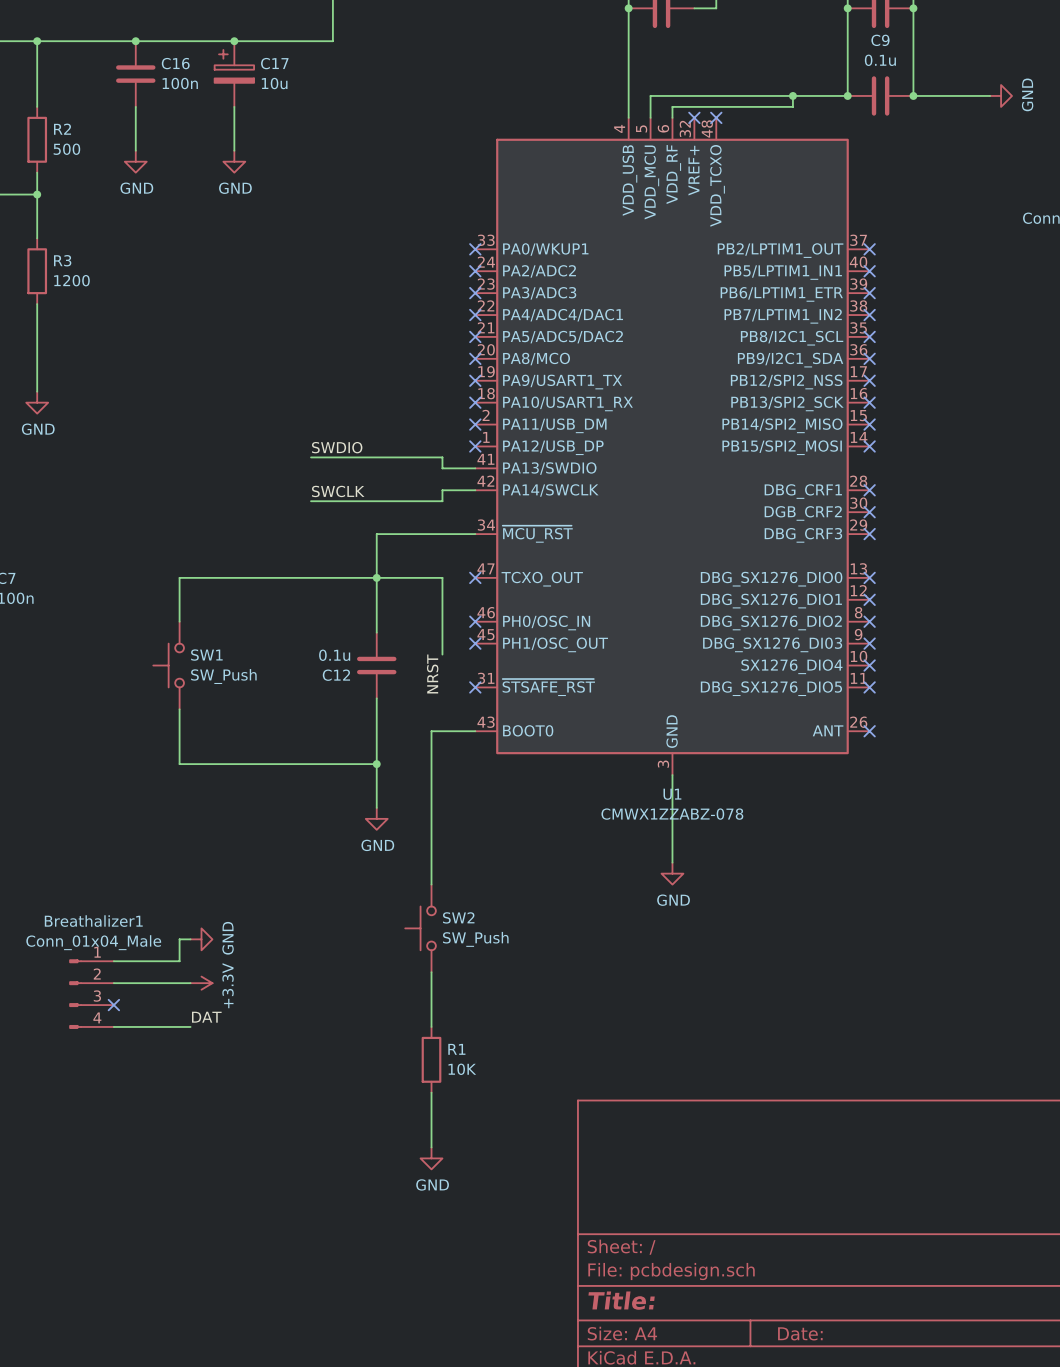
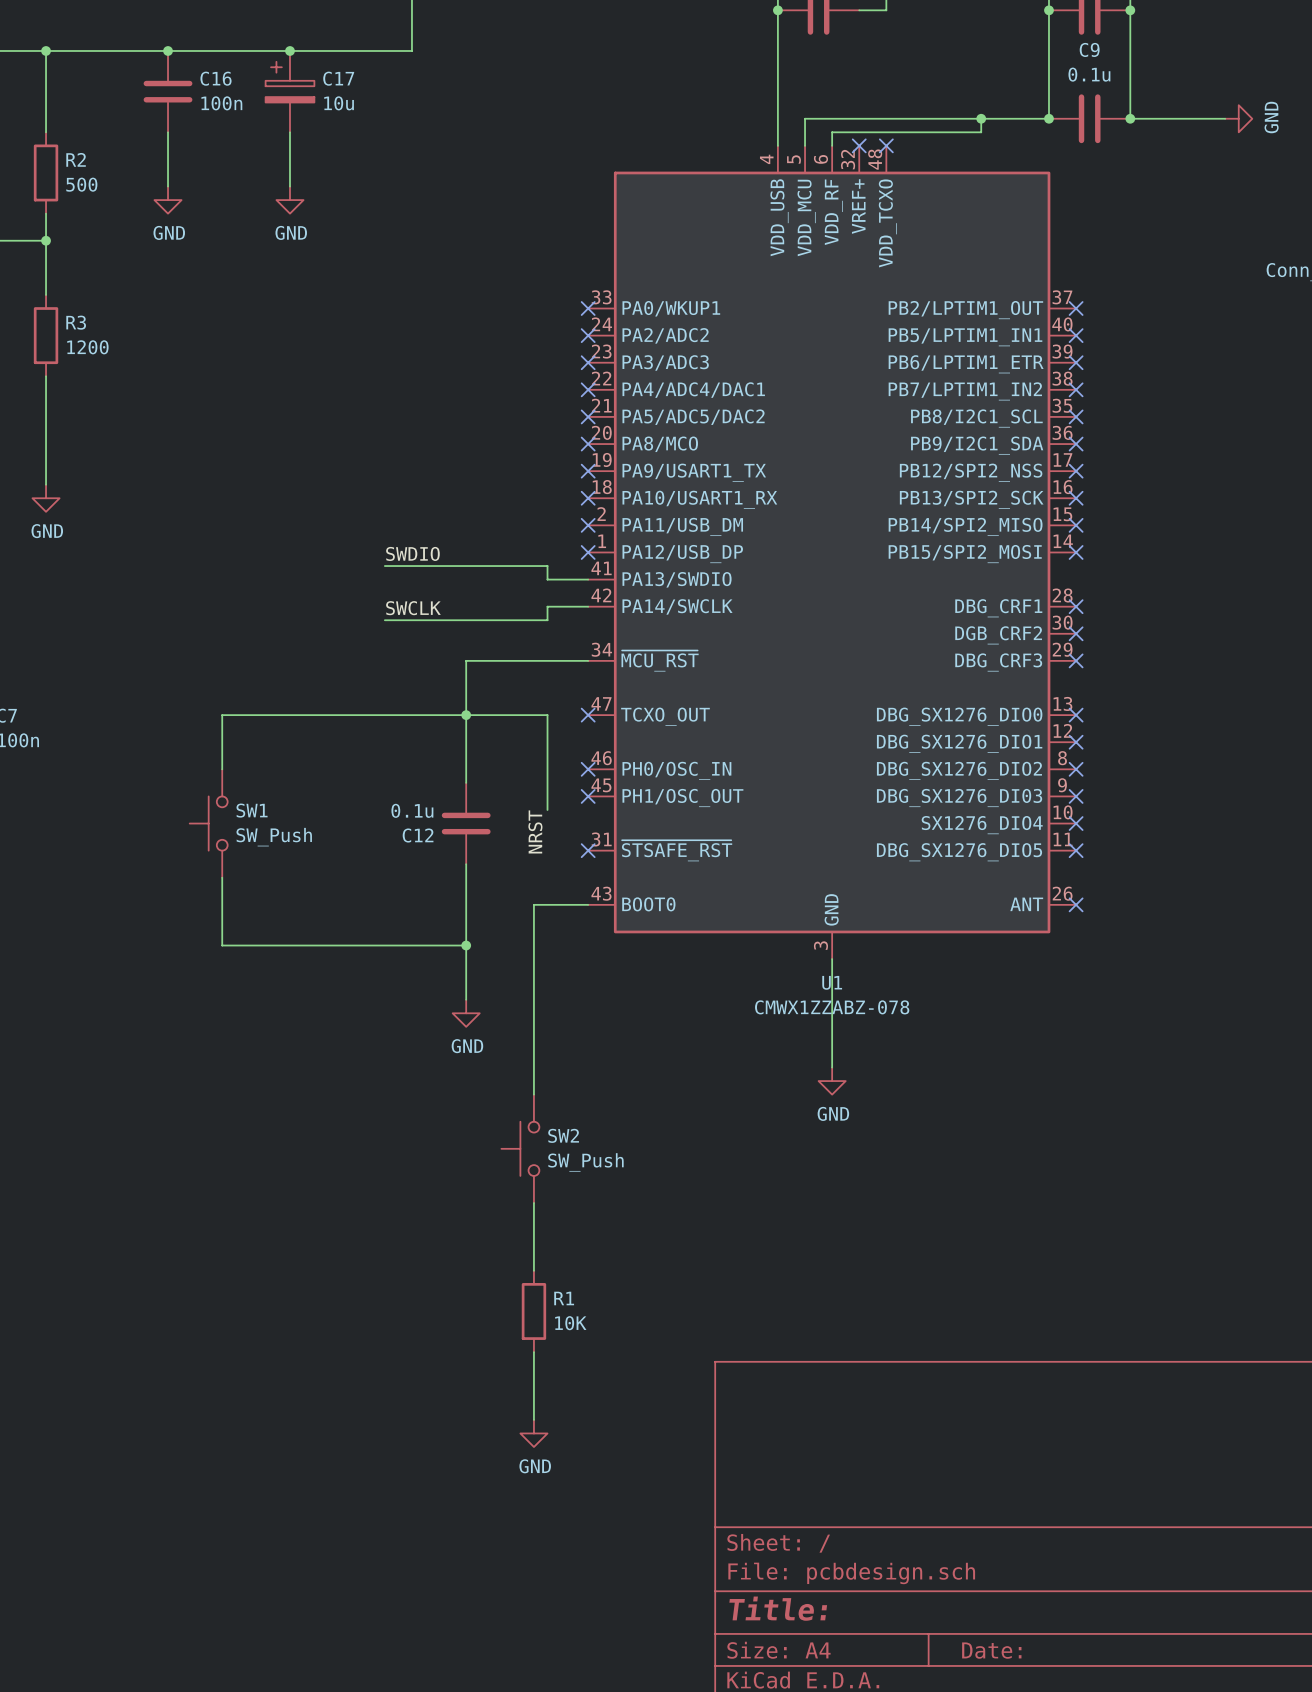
wire: (190, 939) (179, 939) (179, 961) (113, 961) -> none
power symbol: GND (201, 939) -> none
wire: (113, 983) (190, 983) -> none
power symbol: +3.3V (201, 983) -> none
Breathalizer1: Conn_01x04_Male (91, 994) -> none
no-connect mark: (113, 1005) -> none
label: DAT (206, 1017) -> none
wire: (113, 1026) (190, 1026) -> none

